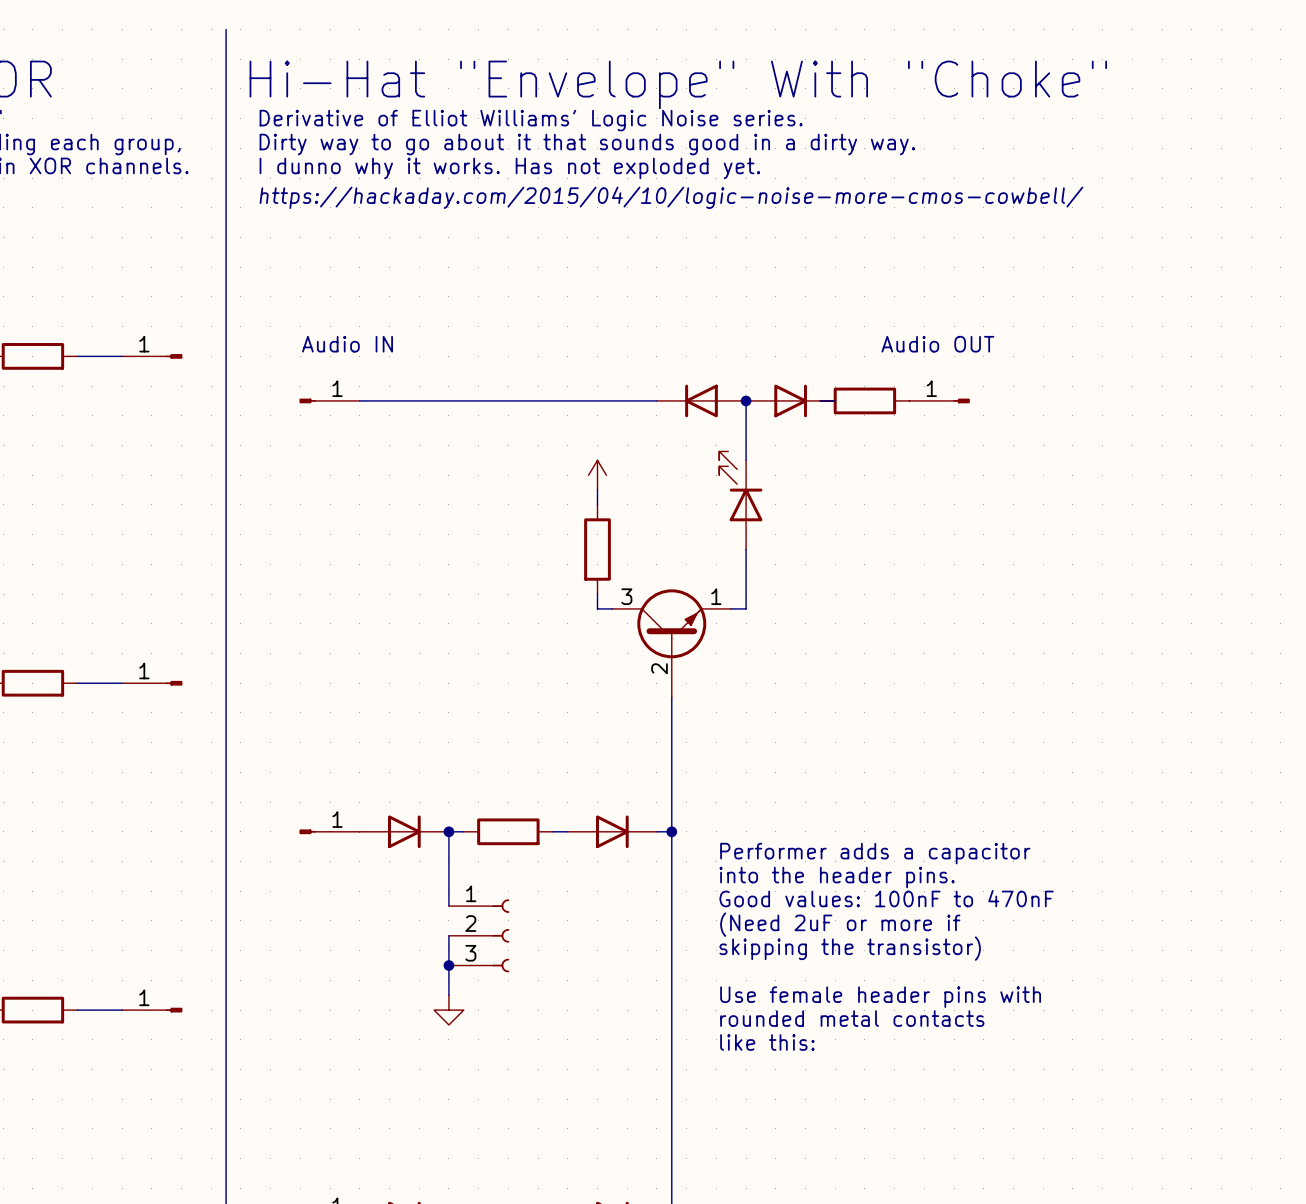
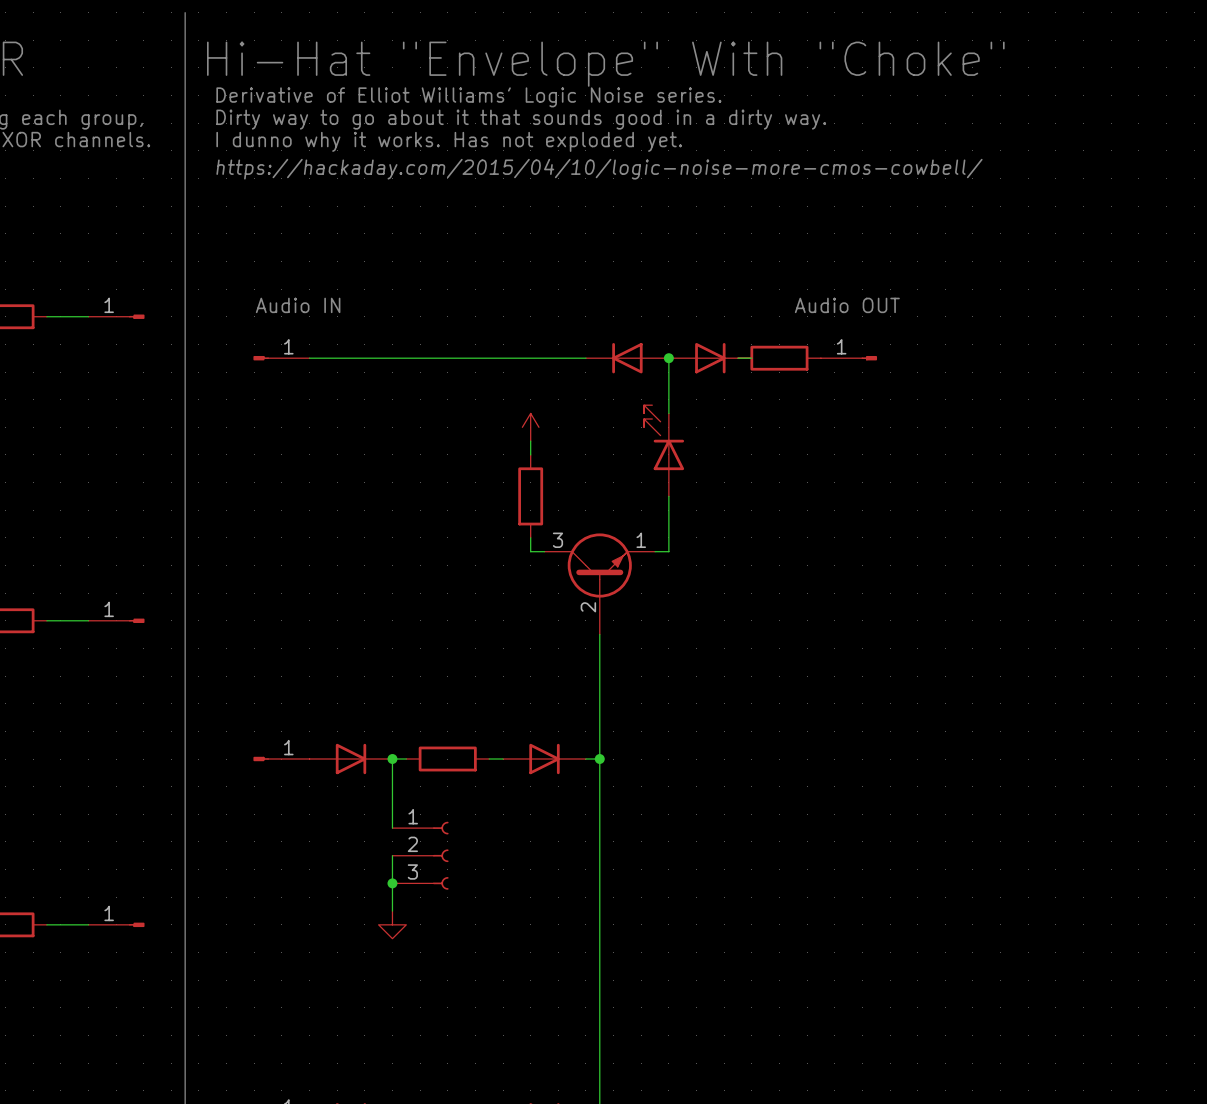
text: Performer adds a capacitor (875, 853) -> none
text: into the header pins. (837, 877) -> none
text: Good values: 100nF to 470nF (886, 898) -> none
text: (Need 2uF or more if (840, 924) -> none
text: skipping the transistor) (850, 948) -> none
text: Use female header pins with (880, 997) -> none
text: rounded metal contacts (852, 1018) -> none
text: like this: (767, 1042) -> none

